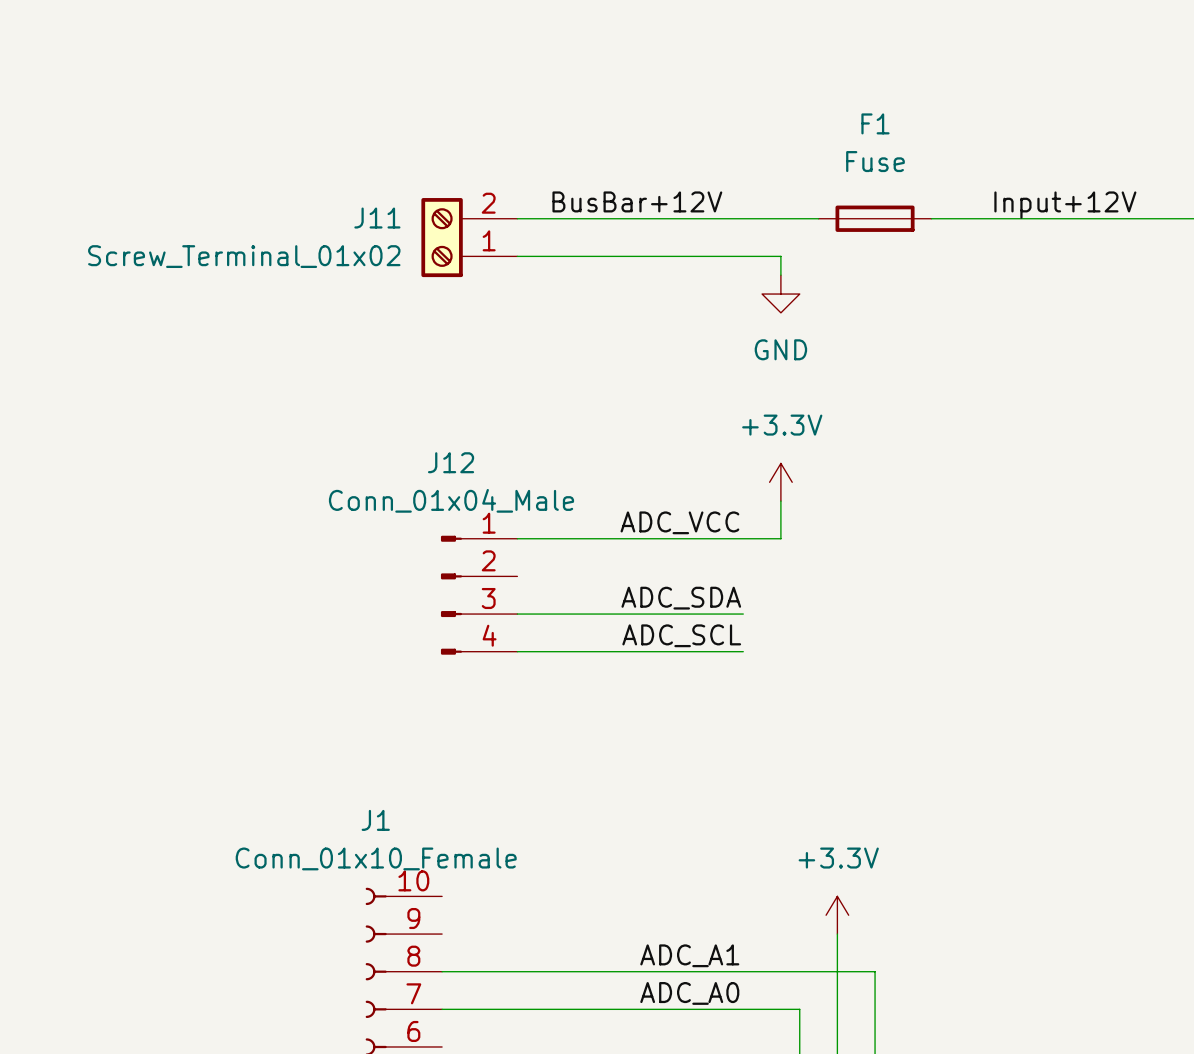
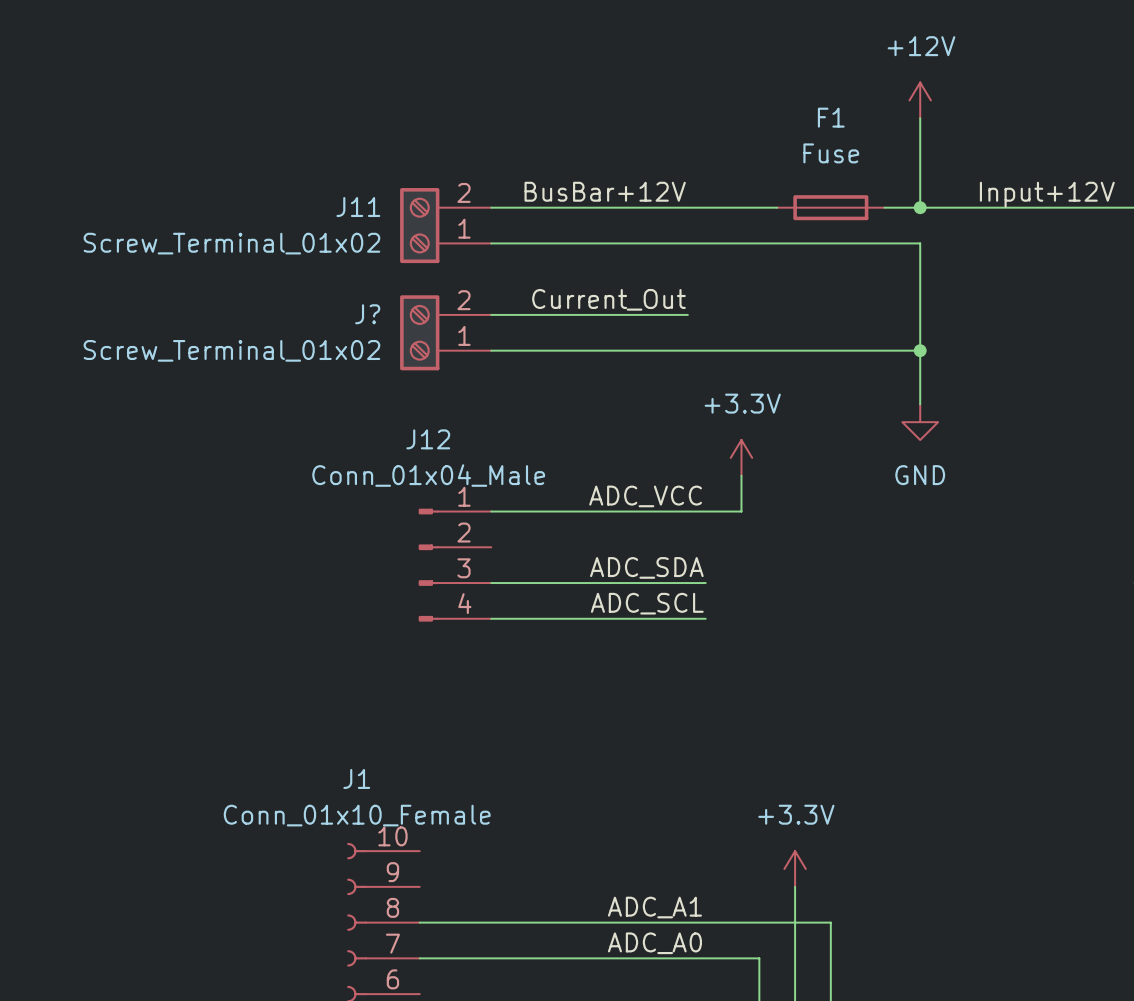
power symbol: none -> +12V (920, 100)
wire: none -> (920, 118) (920, 207)
label position: Input+12V (1065, 205) -> Input+12V (1047, 194)
junction: none -> (920, 207)
wire: (780, 256) (780, 275) -> (741, 243) (920, 243) (920, 404)
power symbol position: GND (780, 294) -> GND (920, 422)
label: none -> Current_Out (608, 299)
wire: none -> (491, 314) (687, 314)
J?: none -> Screw_Terminal_01x02 (445, 332)
wire: none -> (491, 350) (920, 350)
junction: none -> (920, 350)

